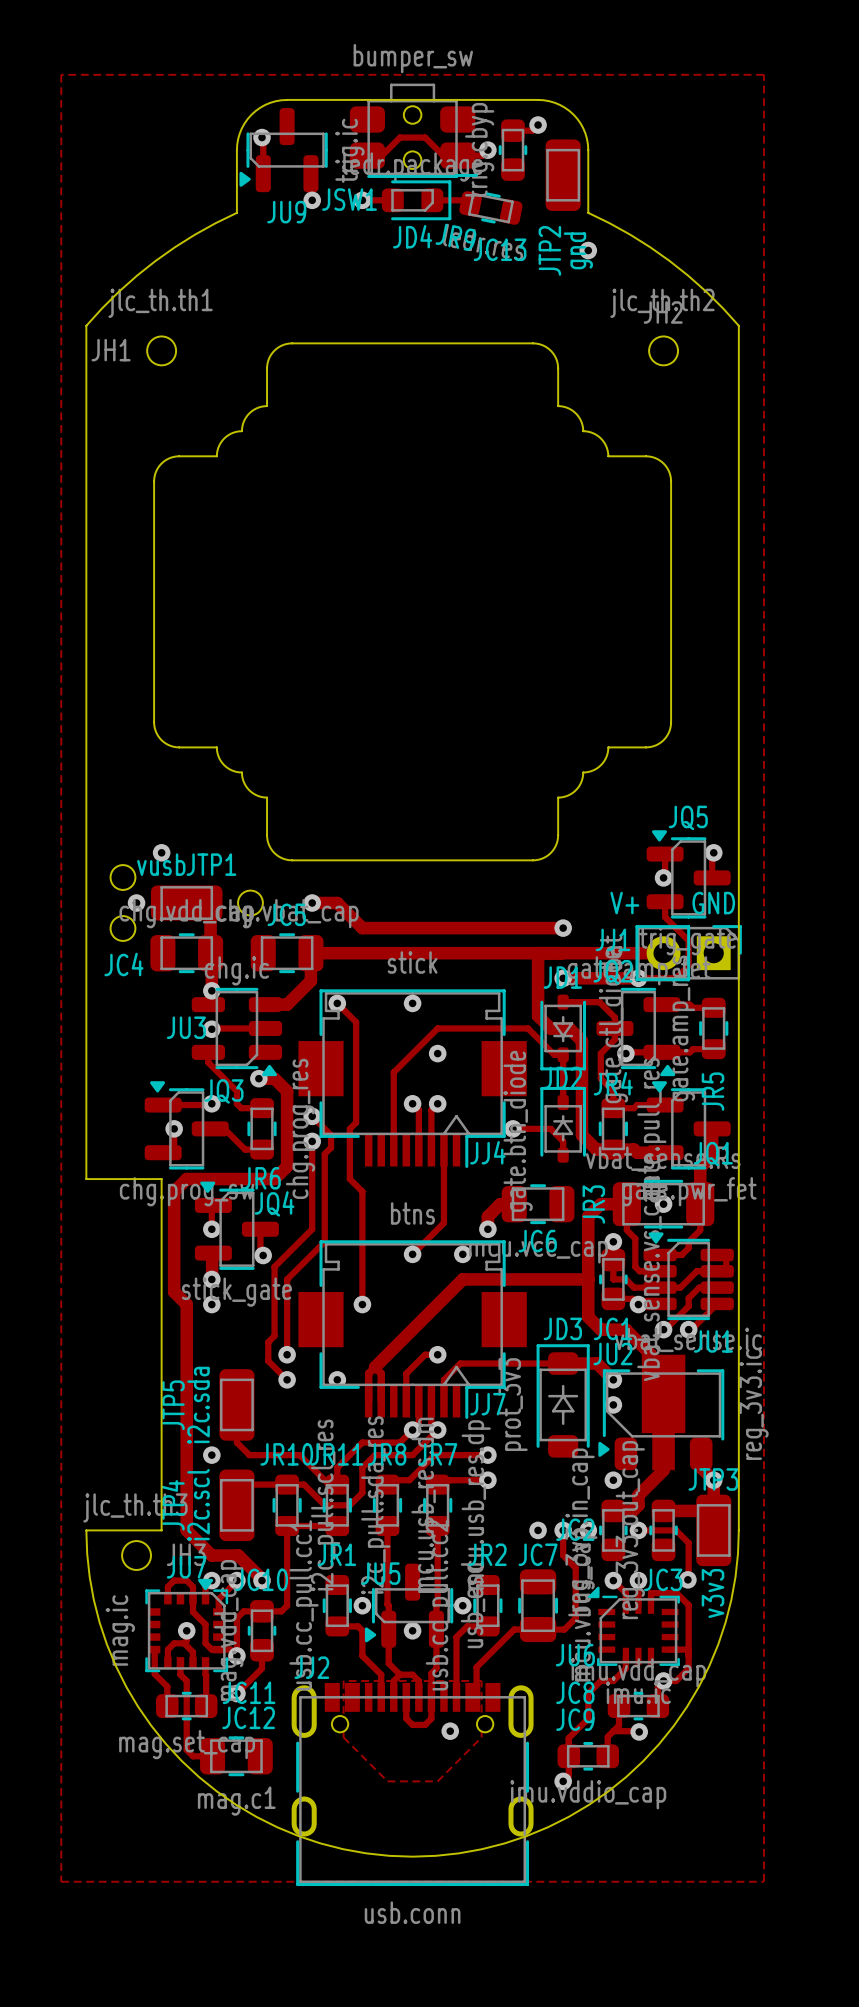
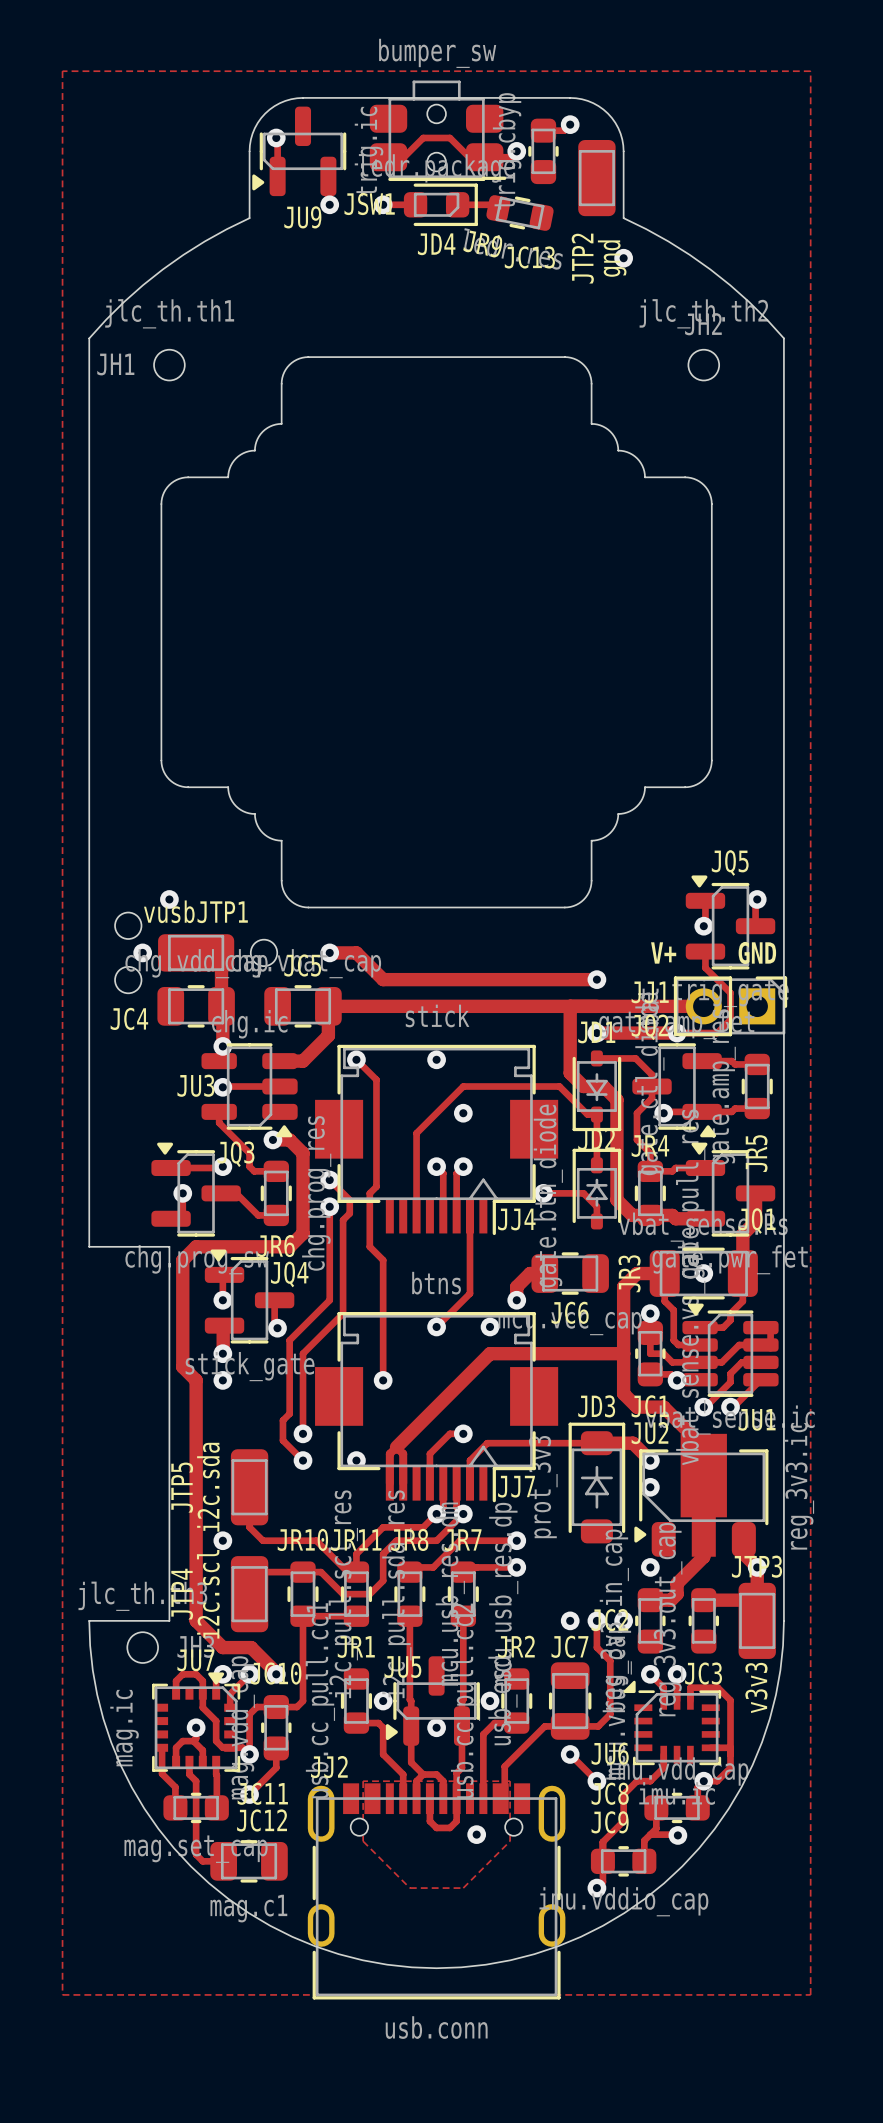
track: (638, 1530) (676, 1530) (688, 1542) (687, 1579) -> none
via: (638, 1530) -> none
via: (687, 1579) -> none
track: none -> (570, 1754) (596, 1781)
via: none -> (570, 1754)
via: none -> (596, 1781)

